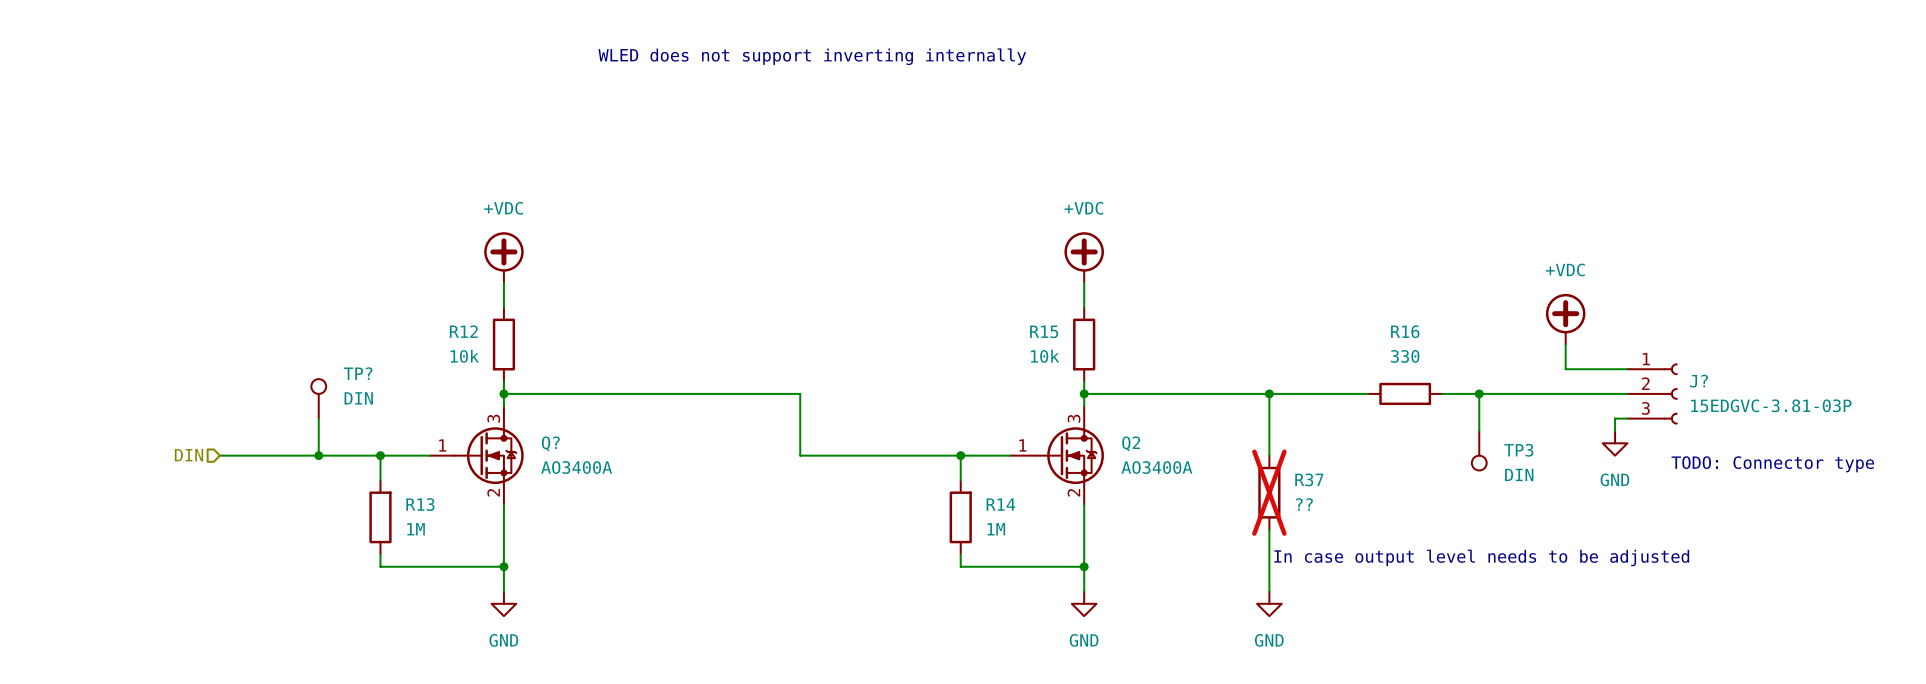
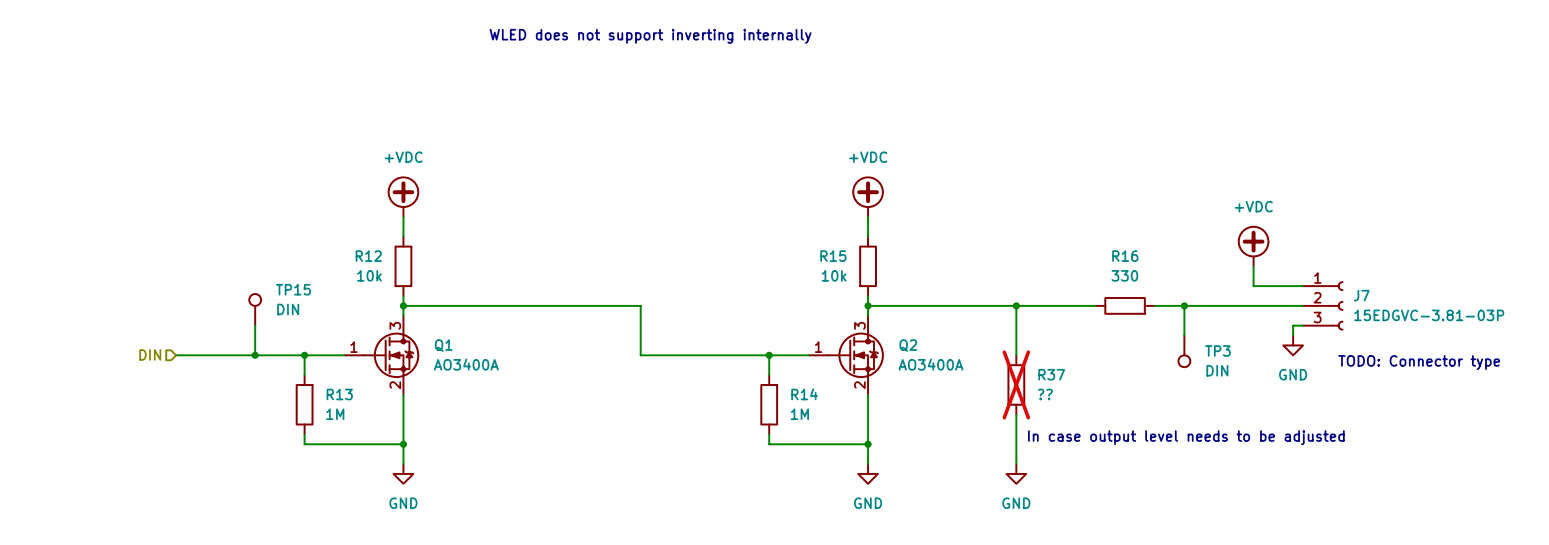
TP? name: TP? (358, 373) -> TP15 (293, 289)
J? name: J? (1699, 381) -> J7 (1361, 295)
Q? name: Q? (550, 443) -> Q1 (443, 345)

